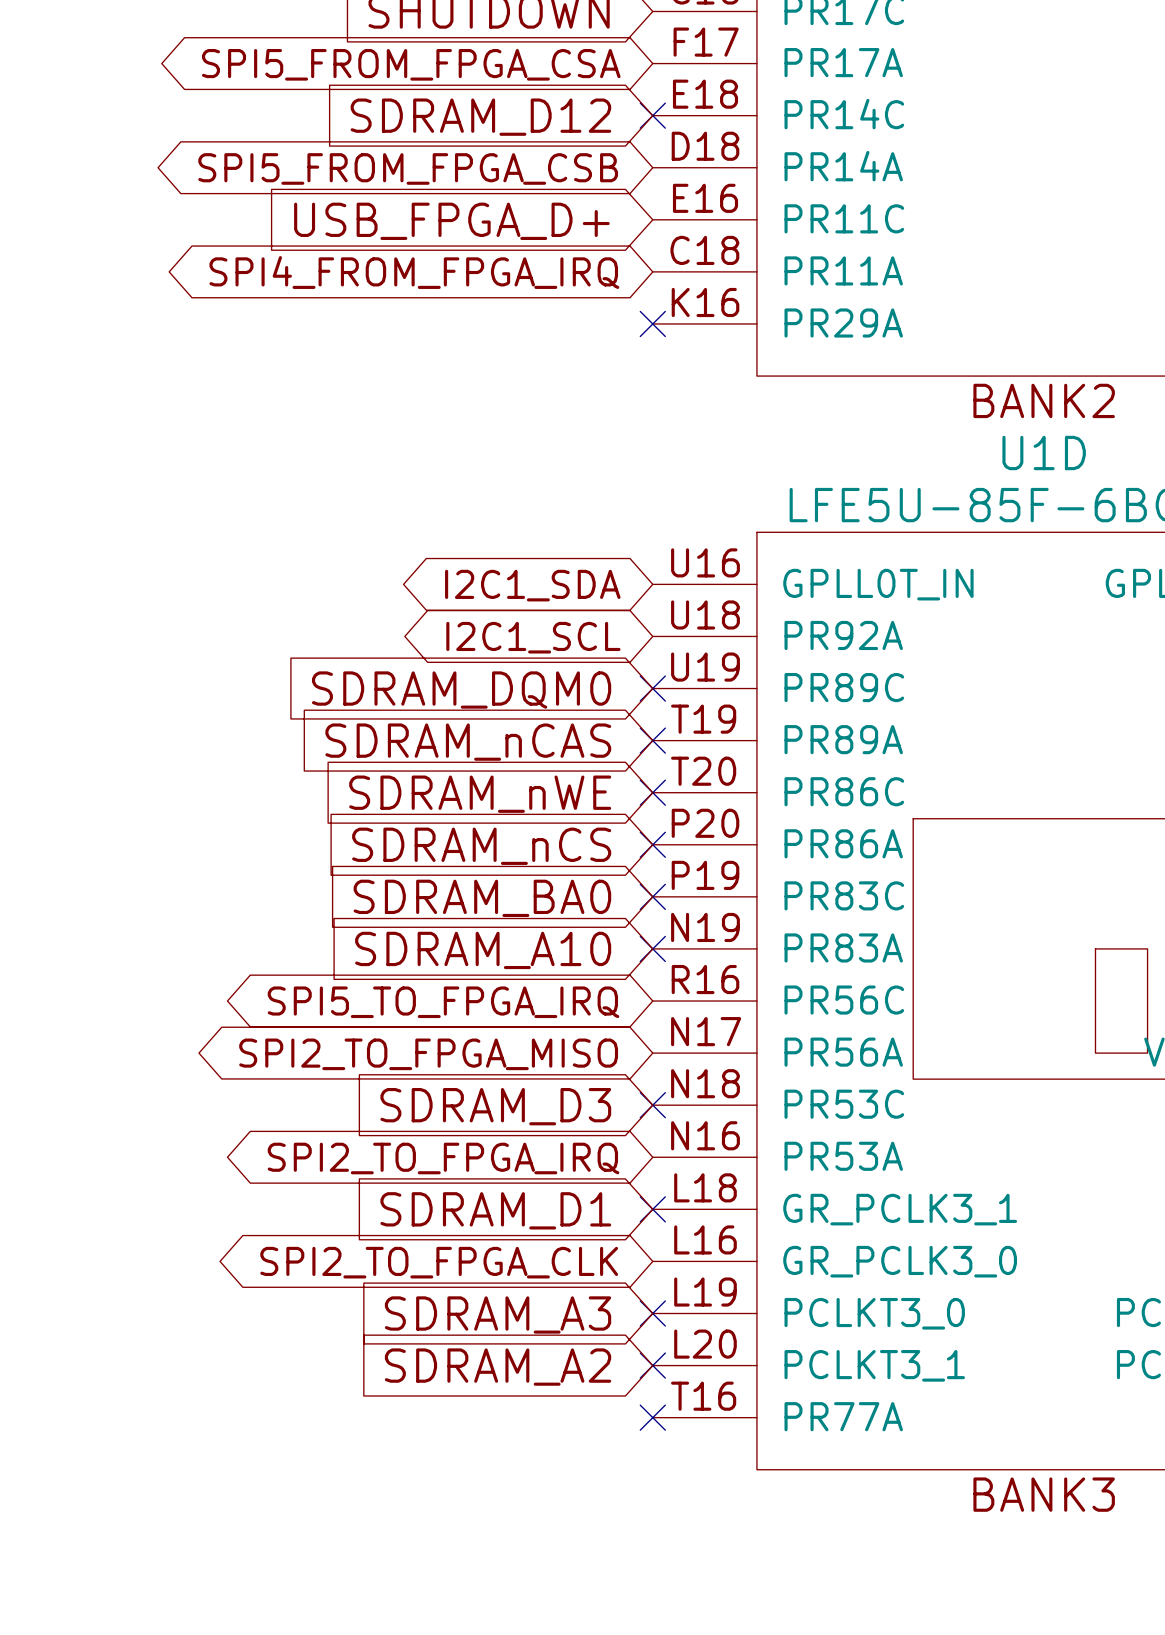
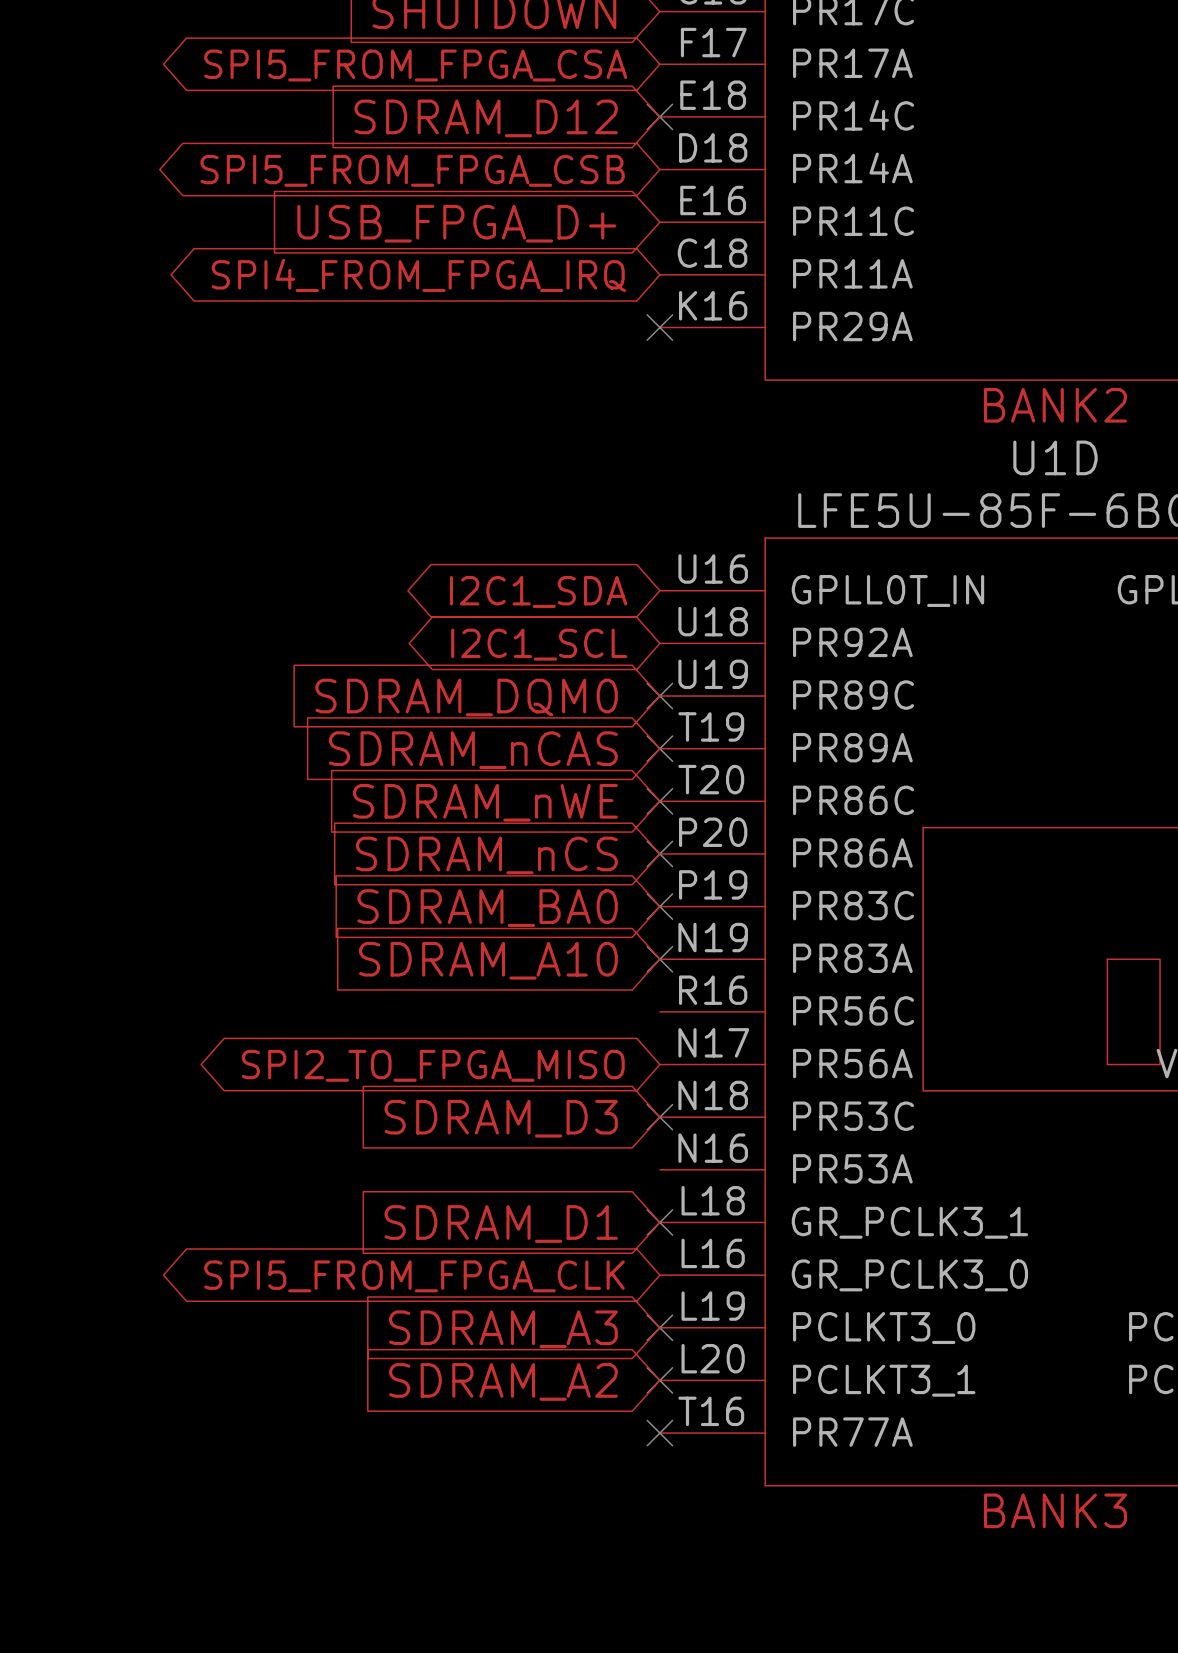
global label: SPI5_TO_FPGA_IRQ (443, 1002) -> none
global label: SPI2_TO_FPGA_IRQ (443, 1158) -> none
global label: SPI2_TO_FPGA_CLK (439, 1262) -> SPI5_FROM_FPGA_CLK (414, 1276)

